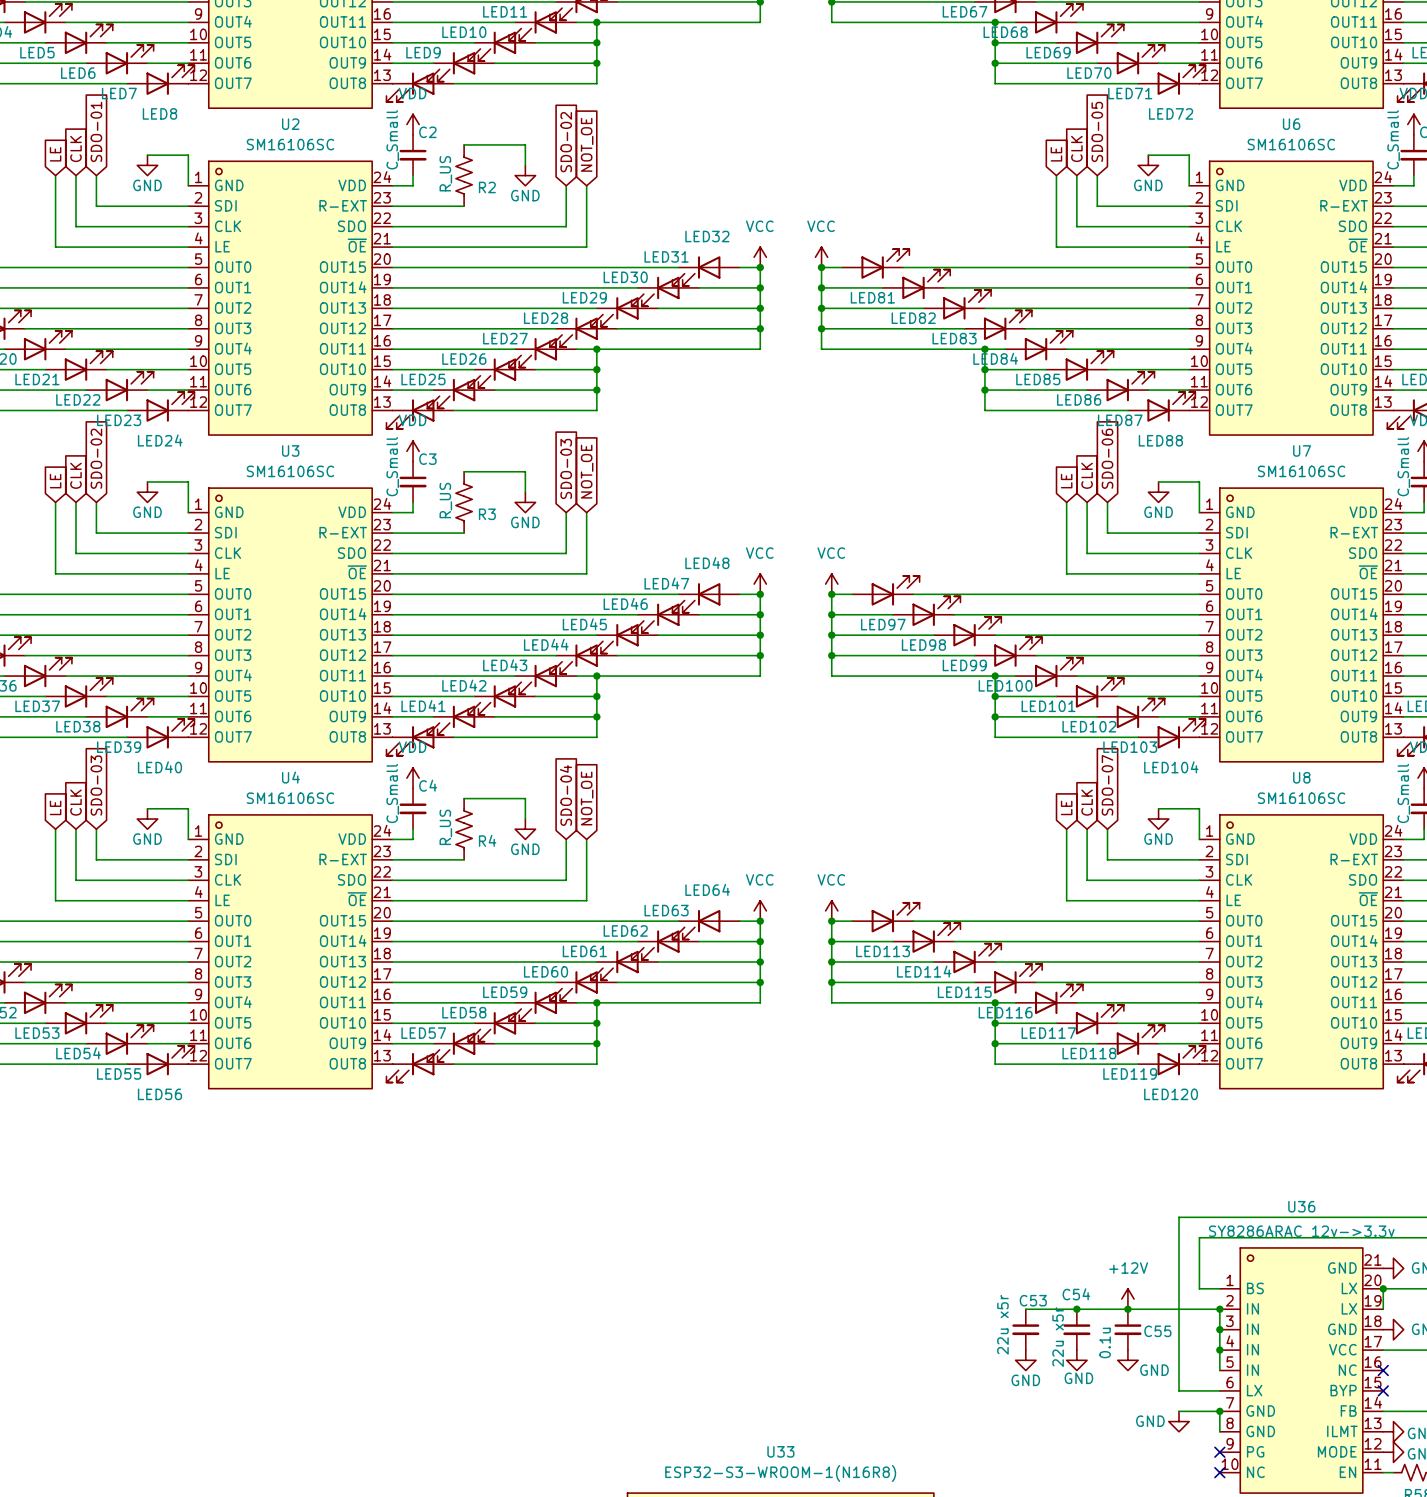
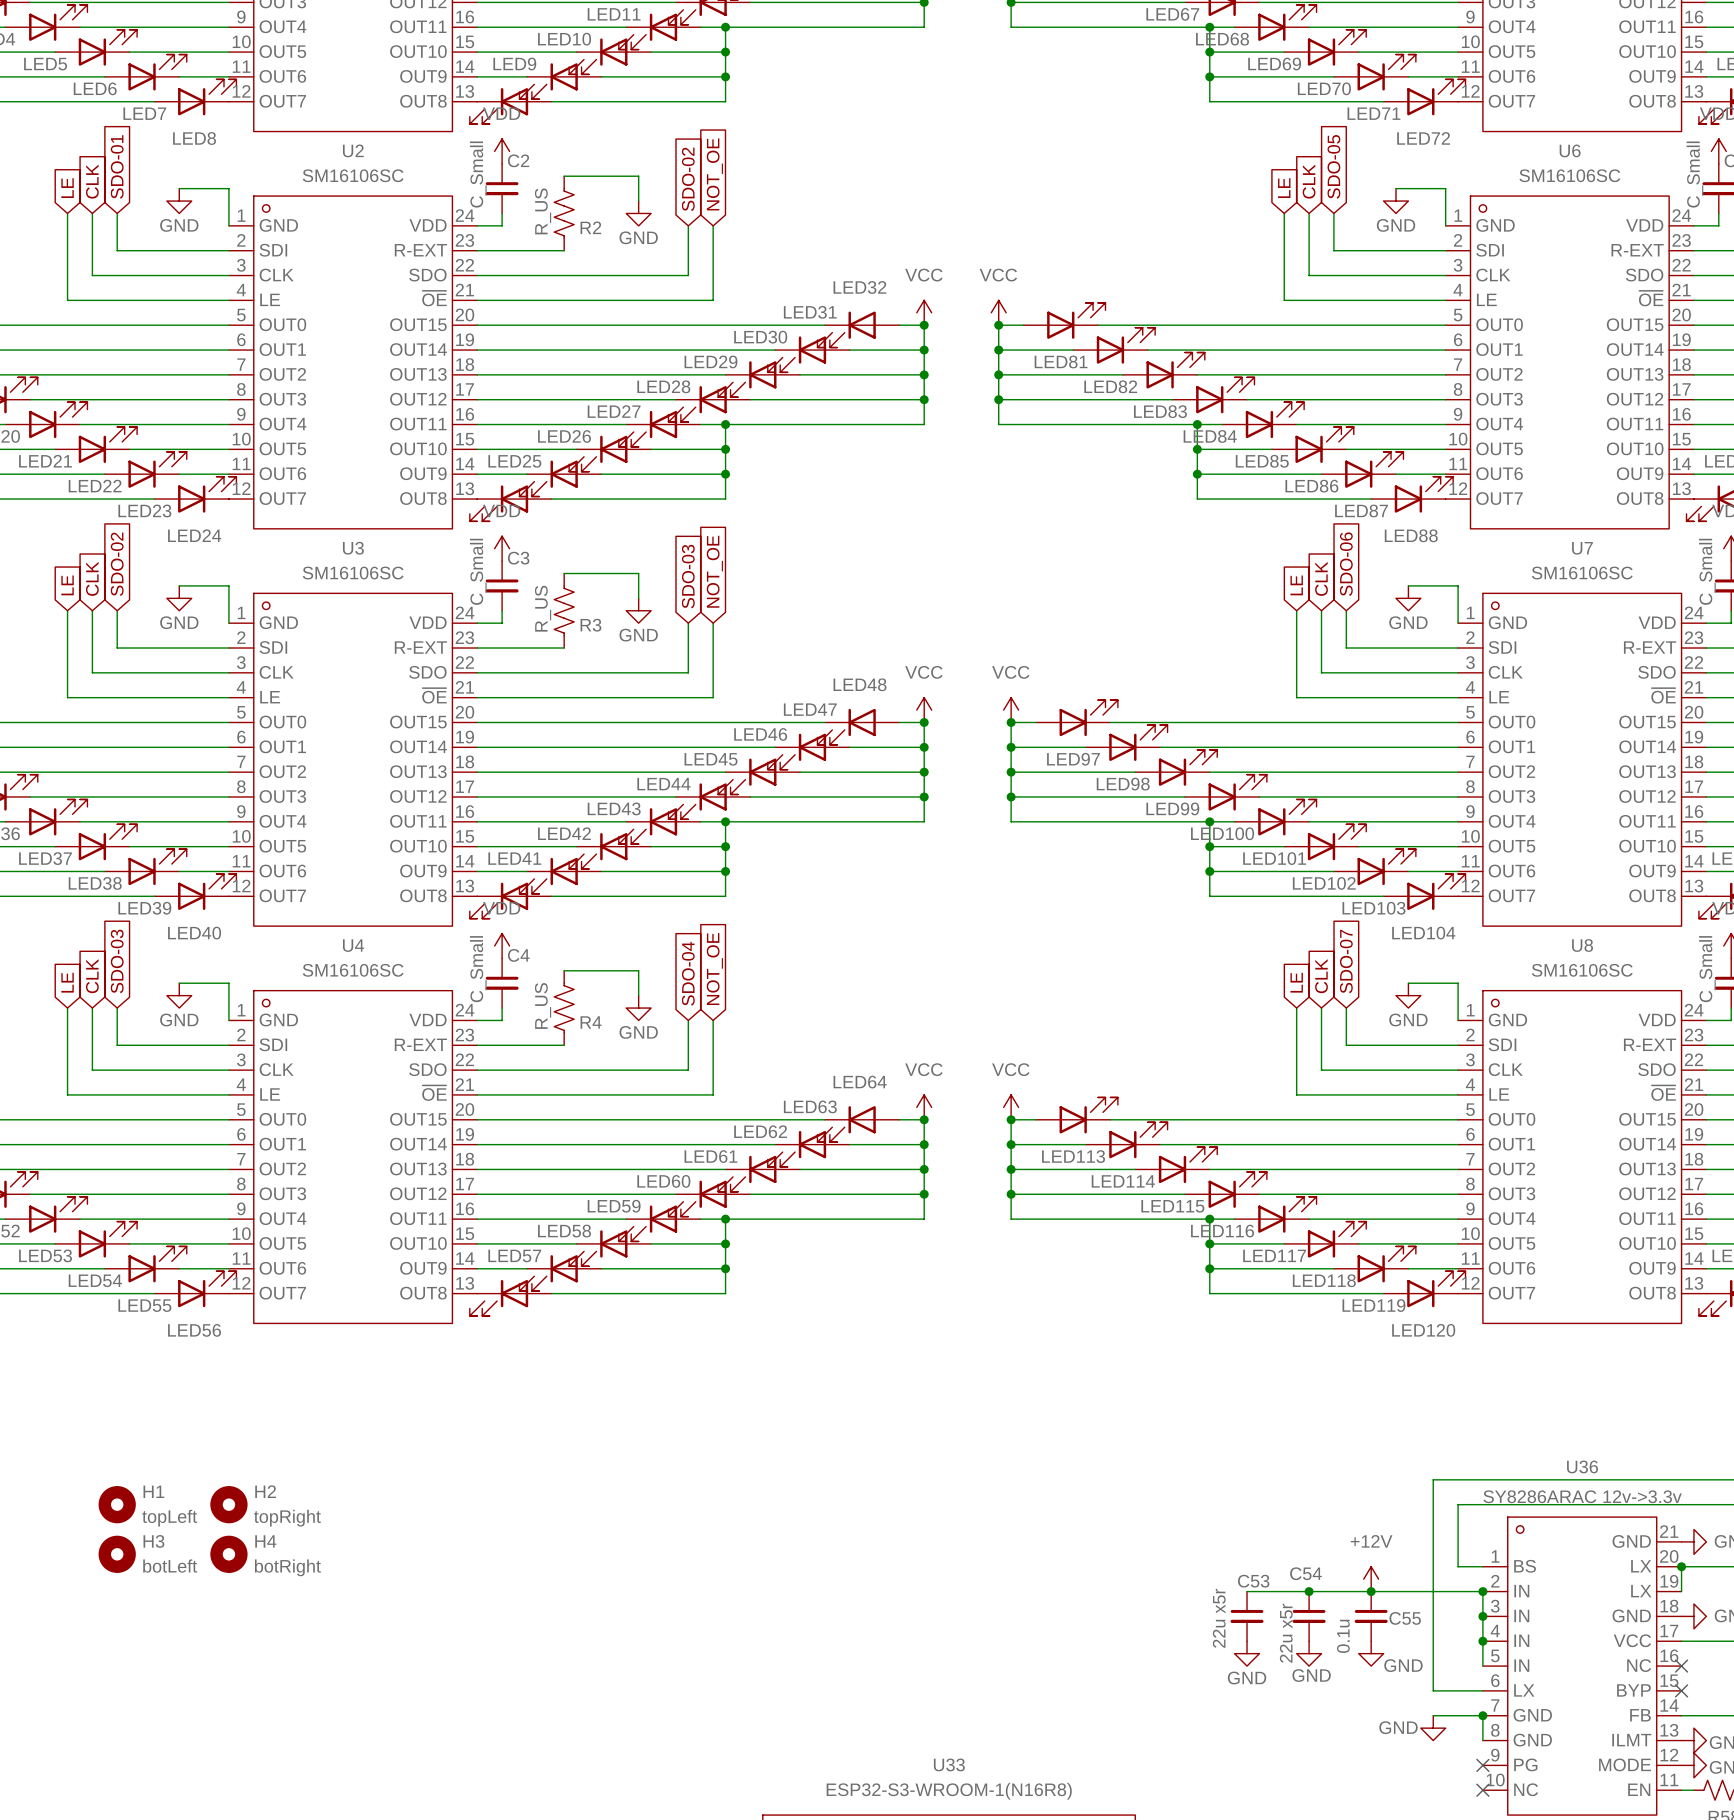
H1: none -> topLeft (117, 1504)
H2: none -> topRight (228, 1504)
H3: none -> botLeft (117, 1554)
H4: none -> botRight (228, 1554)

